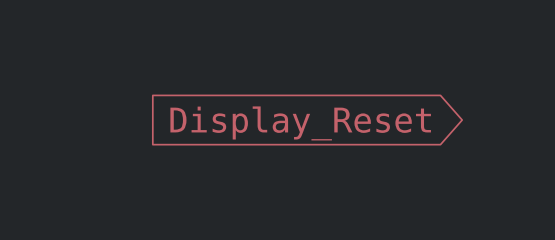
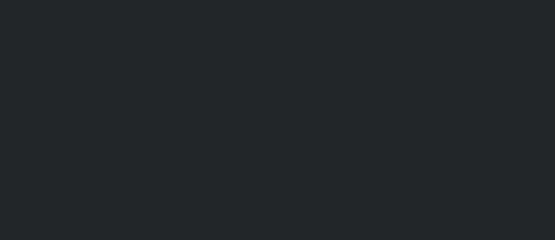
global label: Display_Reset (300, 123) -> none

